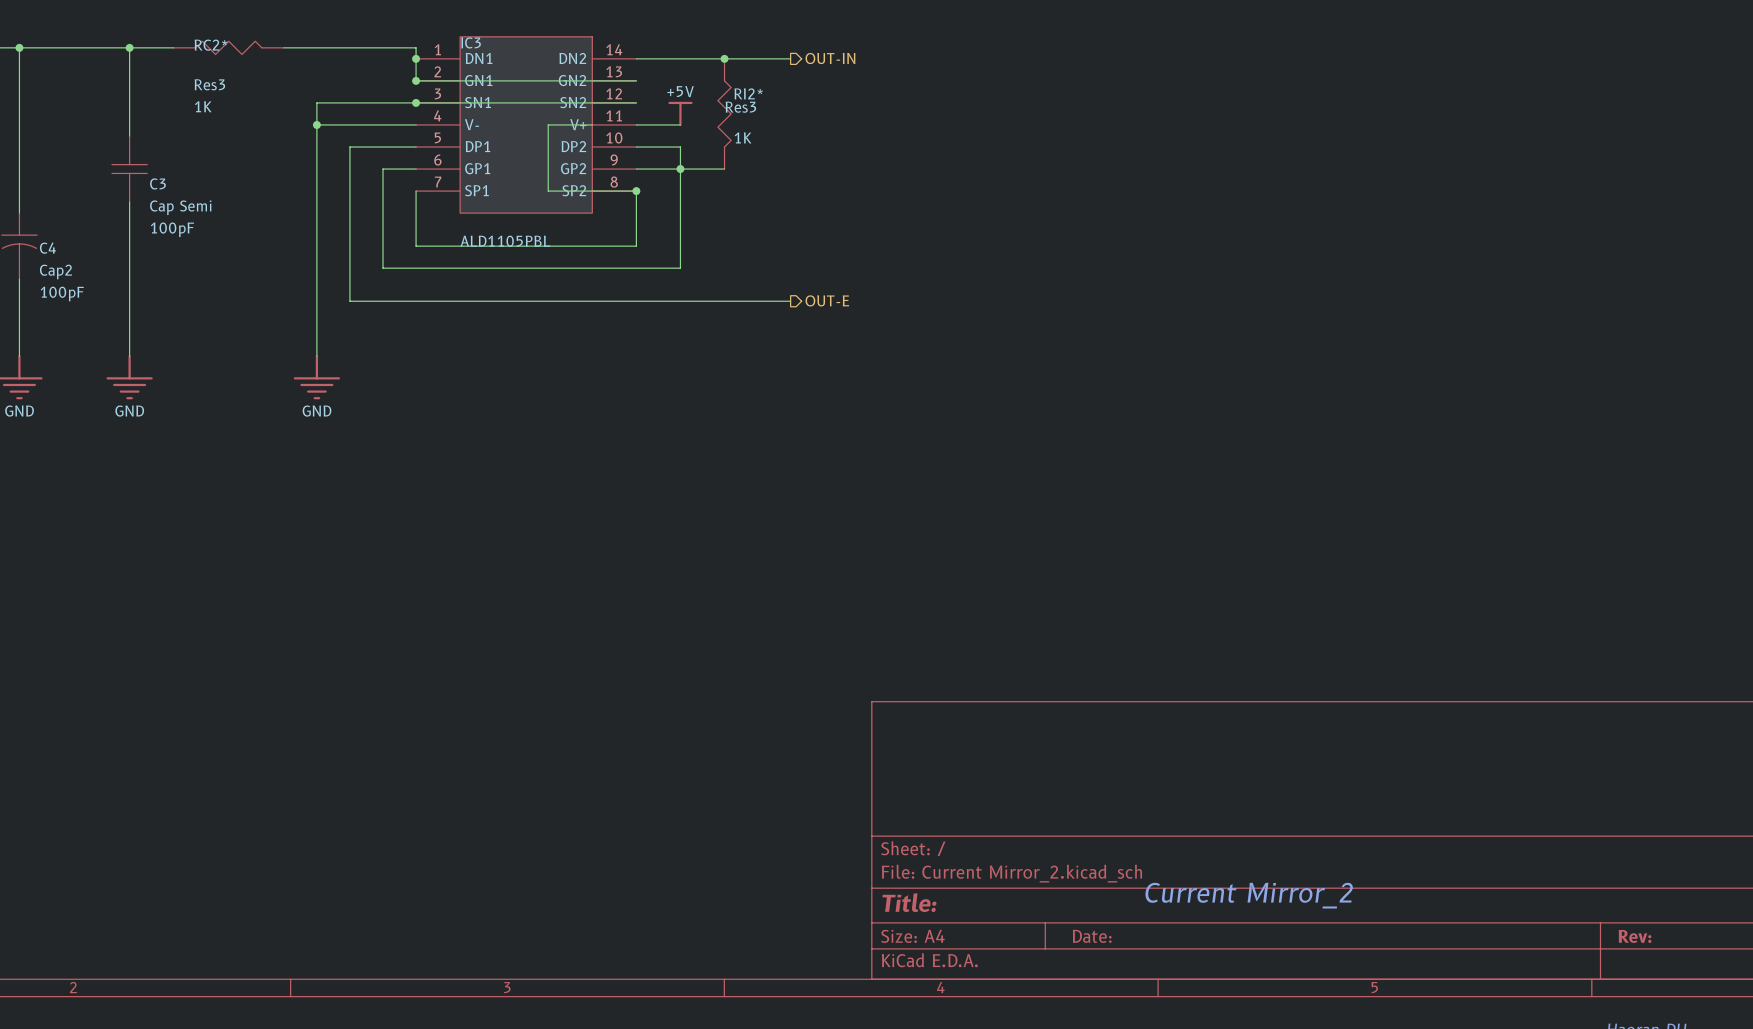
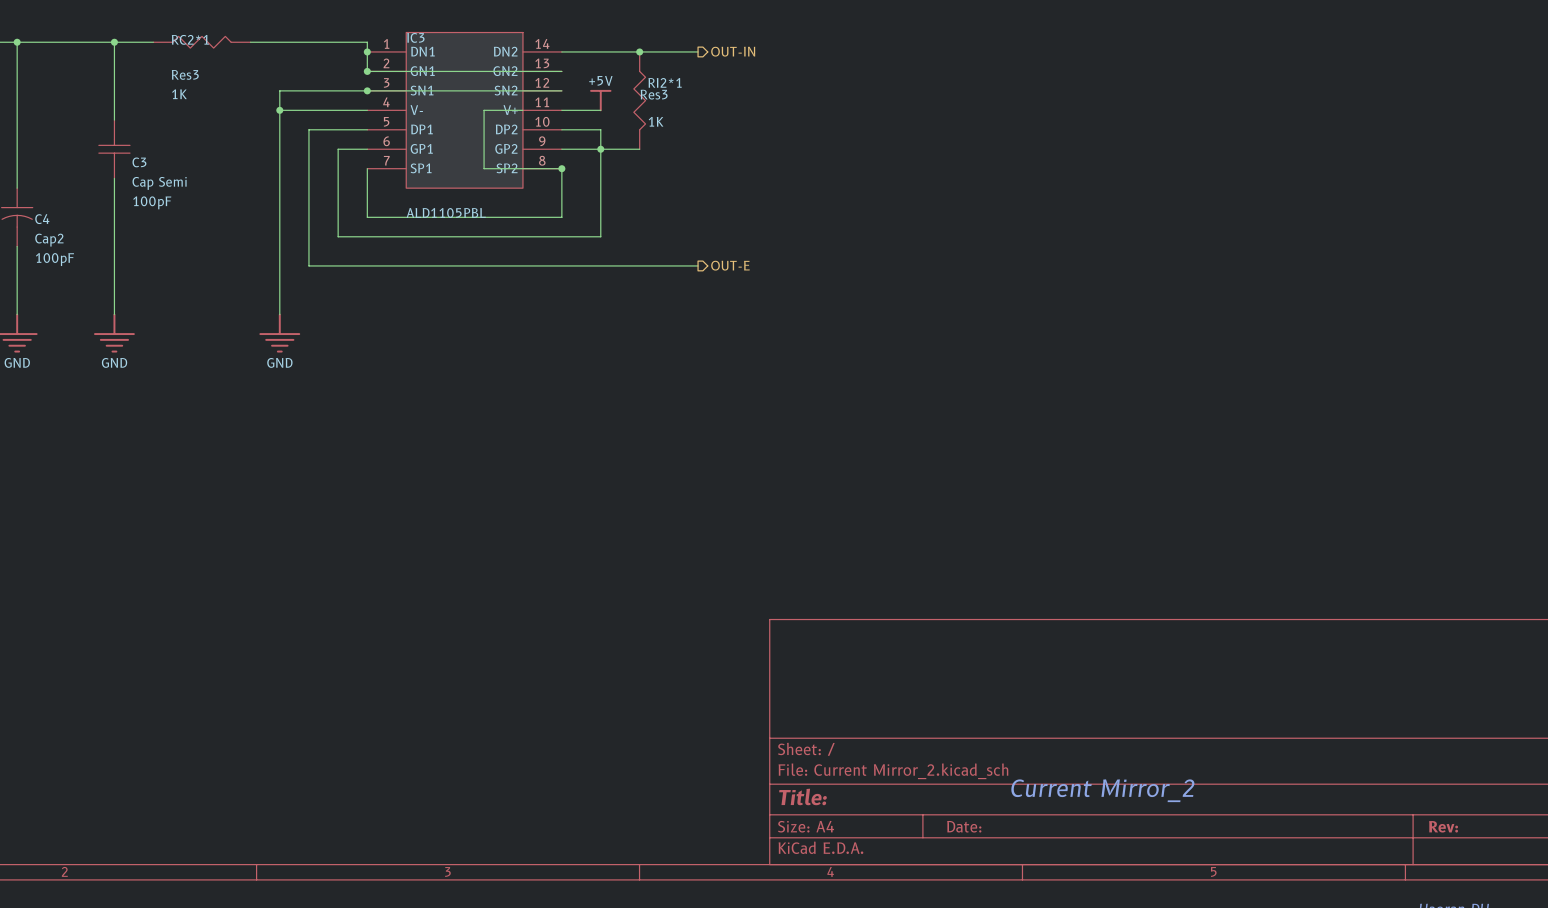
RC2* name: RC2* (211, 45) -> RC2*1 (190, 39)
RI2* name: RI2* (748, 93) -> RI2*1 (665, 82)

